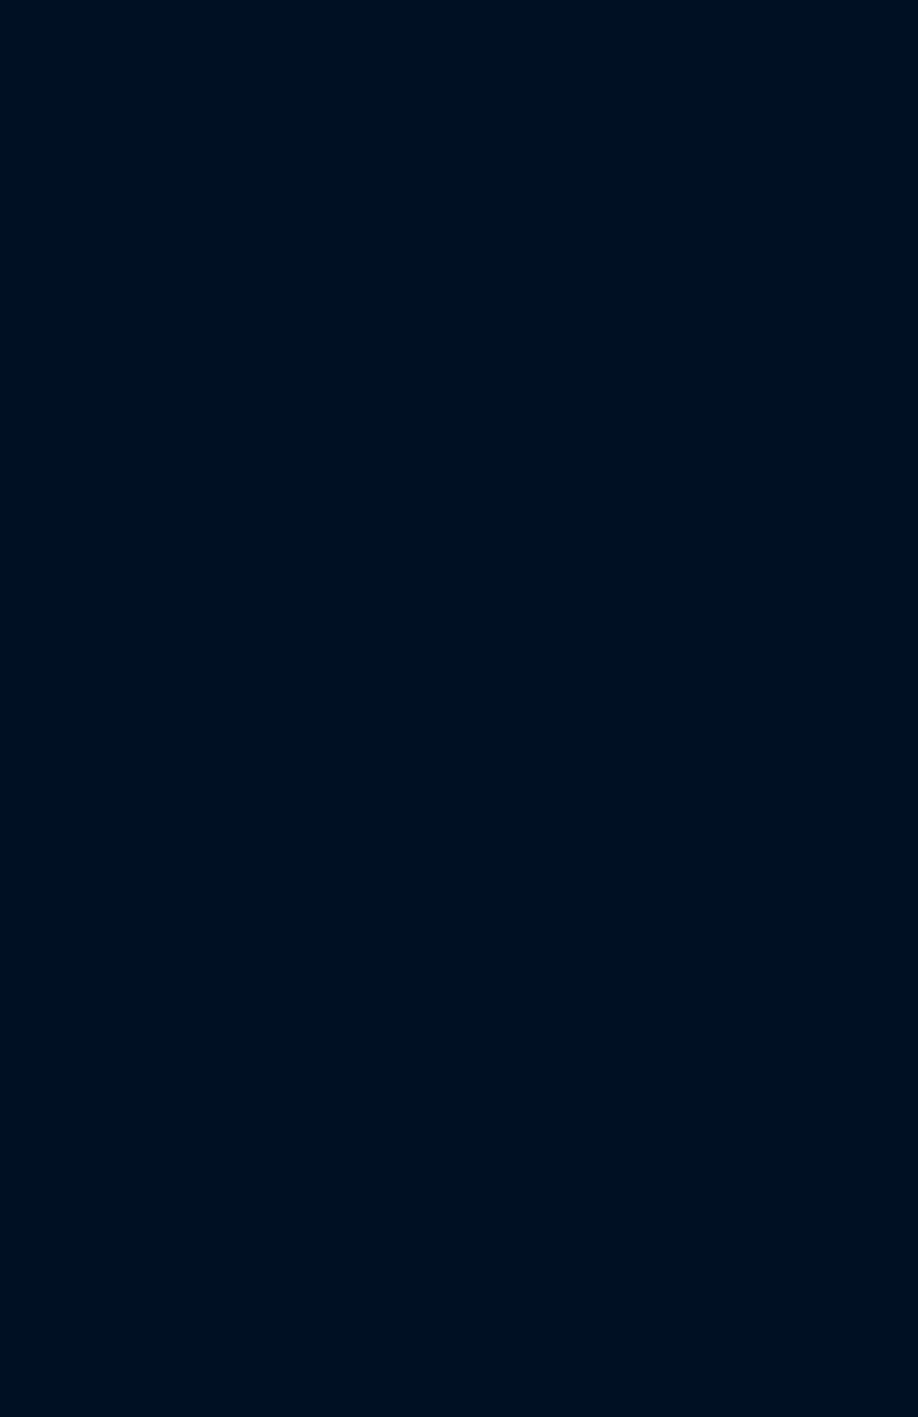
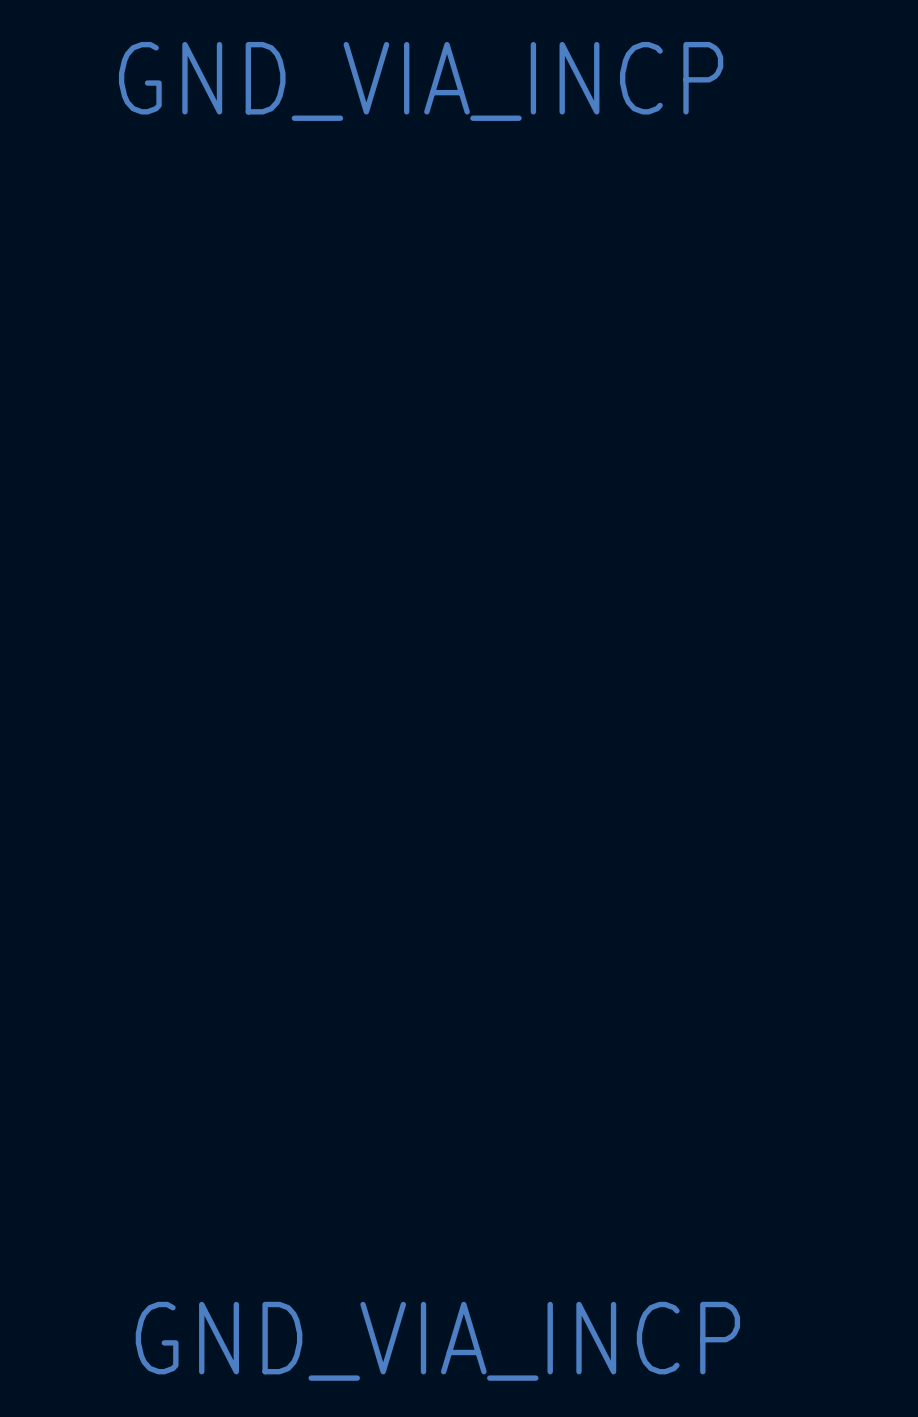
text: none -> GND_VIA_INCP (421, 81)
text: none -> GND_VIA_INCP (437, 1341)

